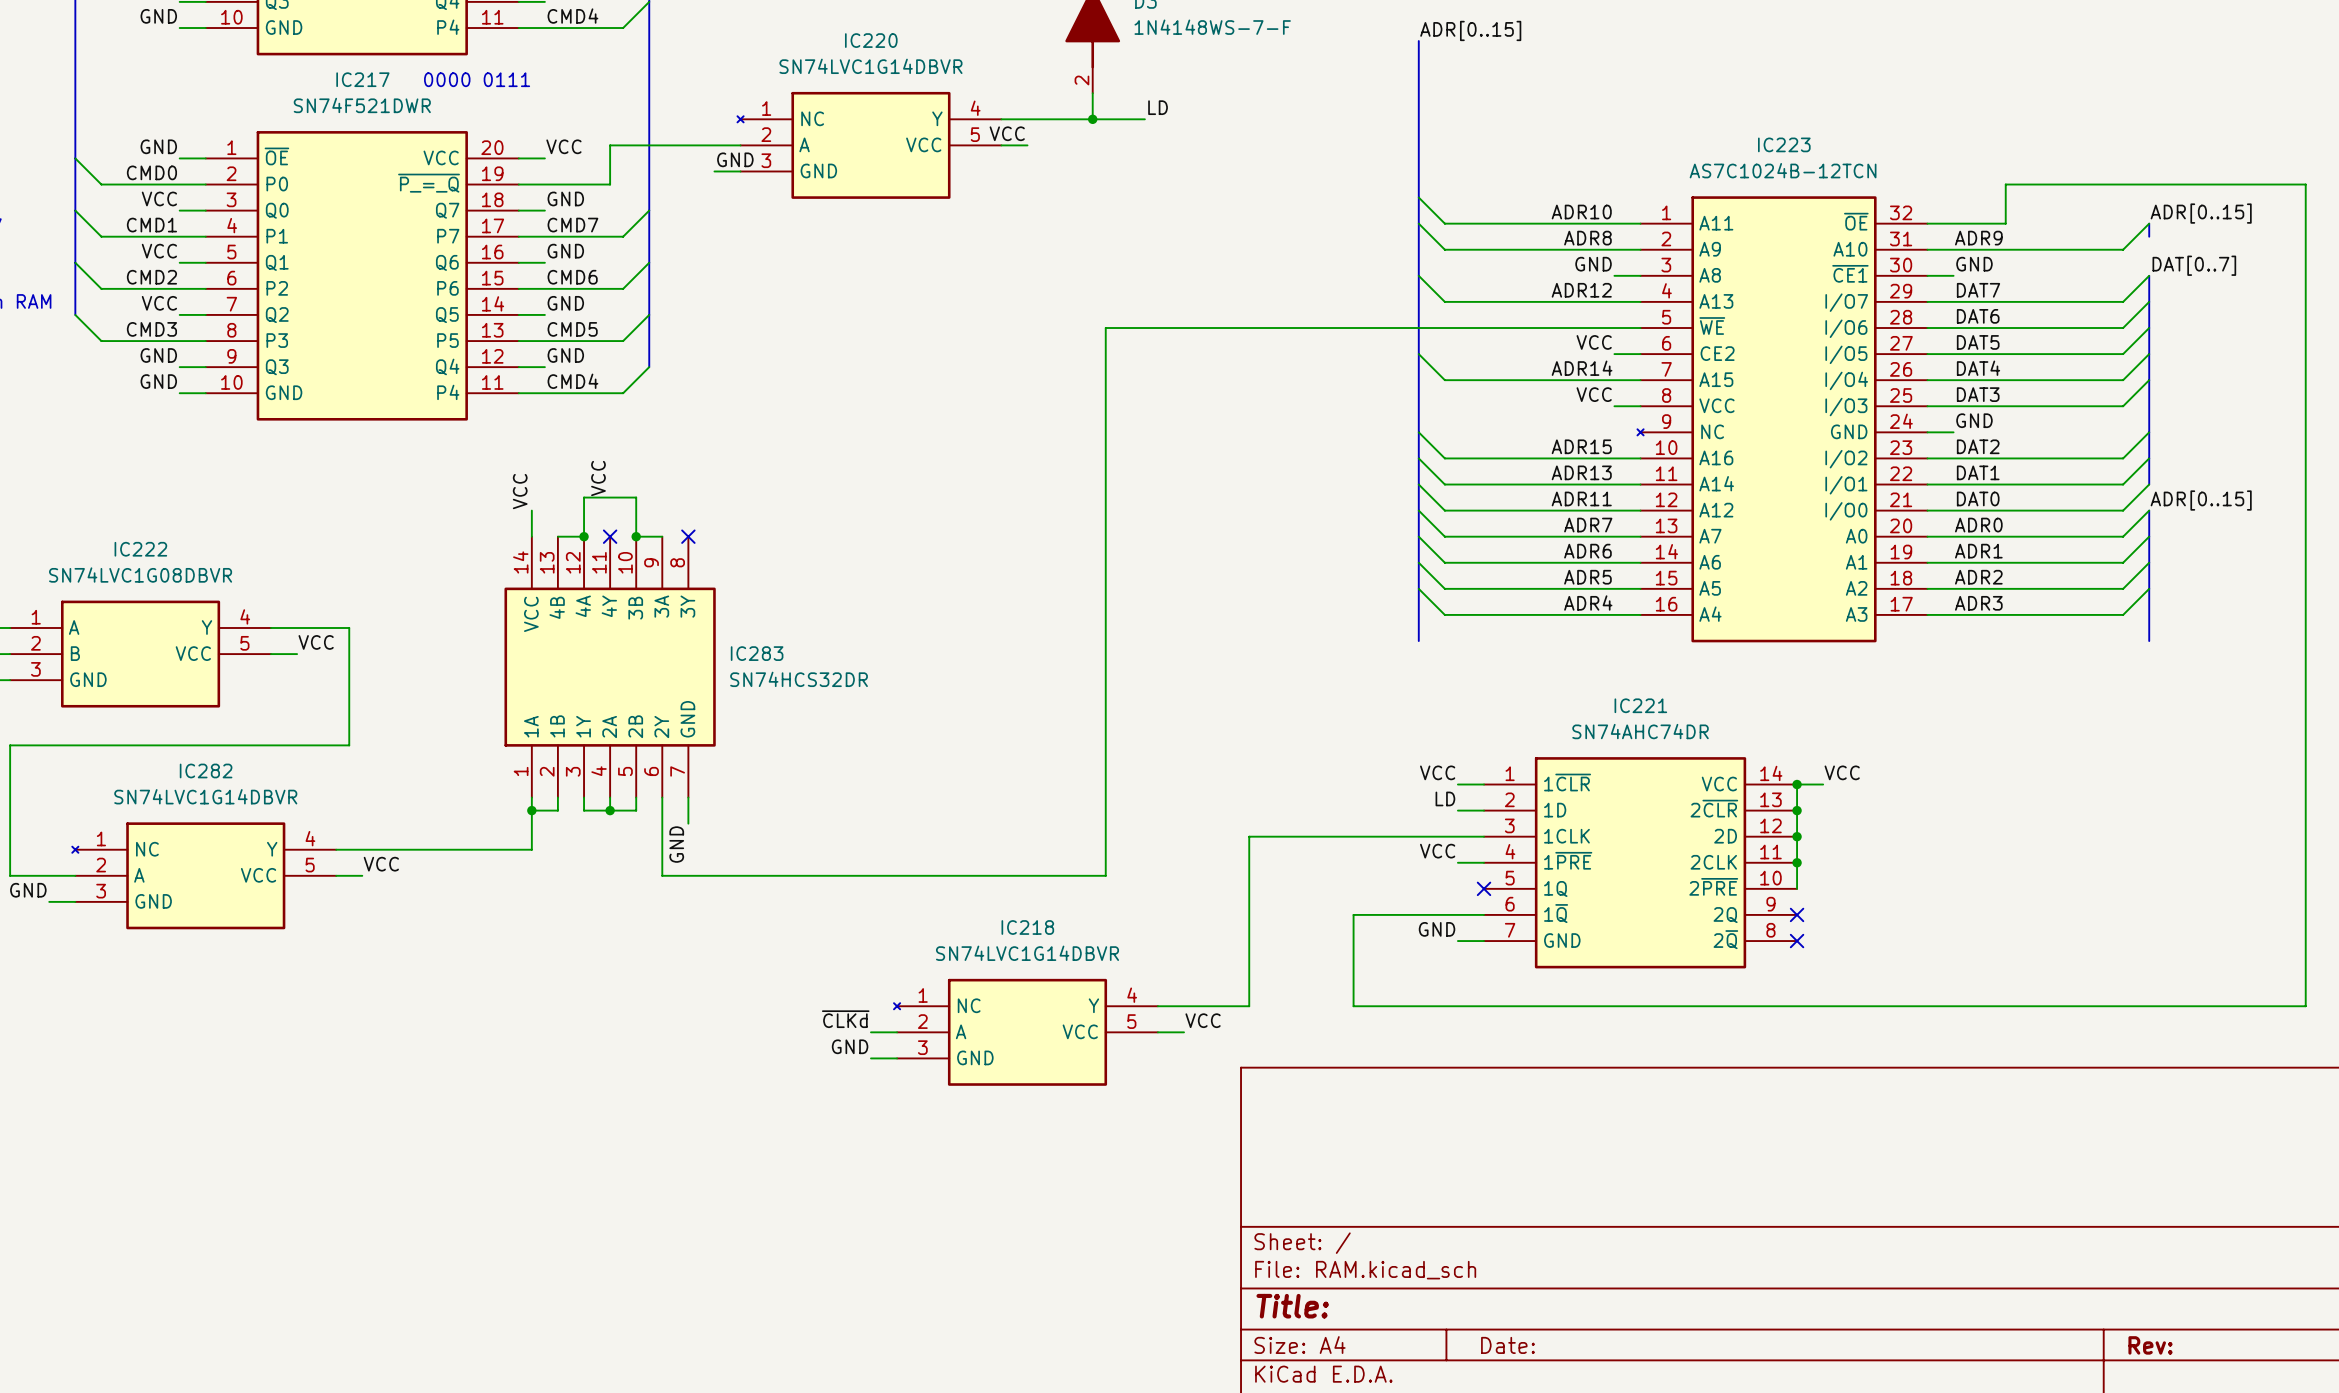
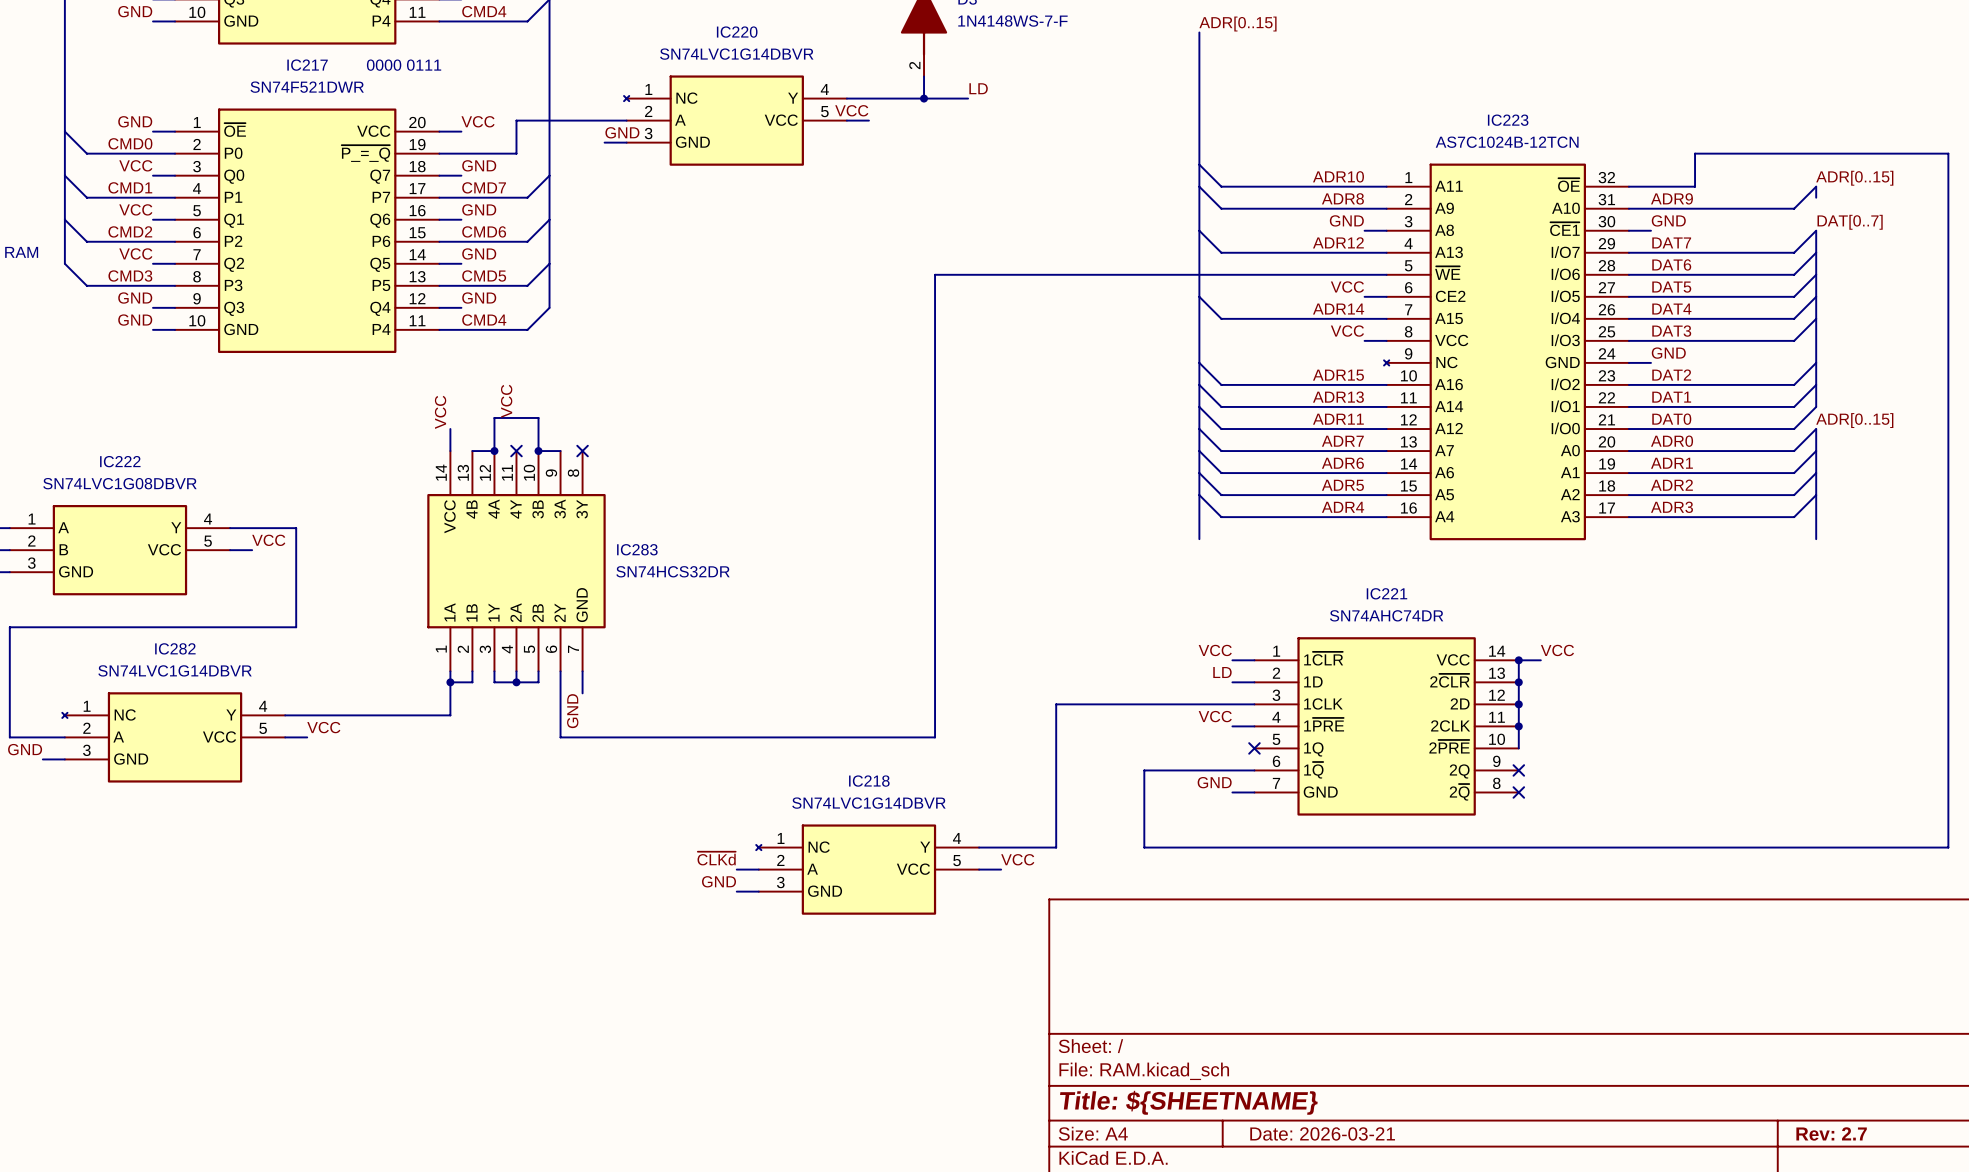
title block: Title: (1292, 1306) -> Title: ${SHEETNAME} (1188, 1102)
title block: Date: (1507, 1345) -> Date: 2026-03-21 (1322, 1133)
title block: Rev: (2150, 1345) -> Rev: 2.7 (1831, 1133)

